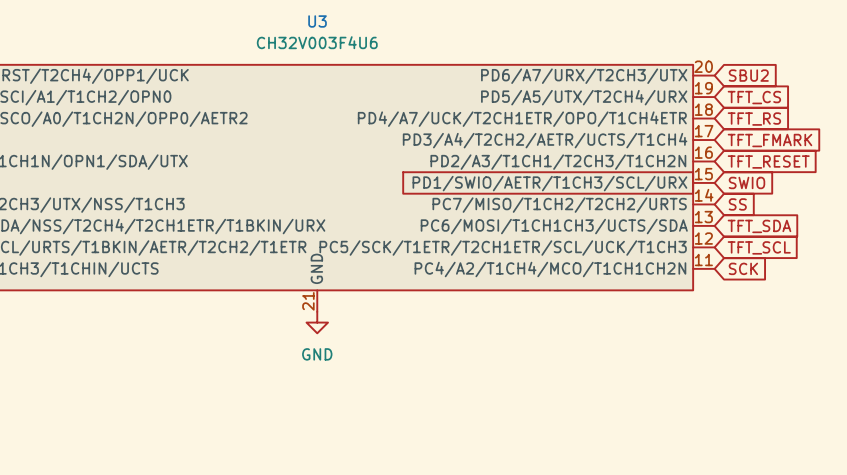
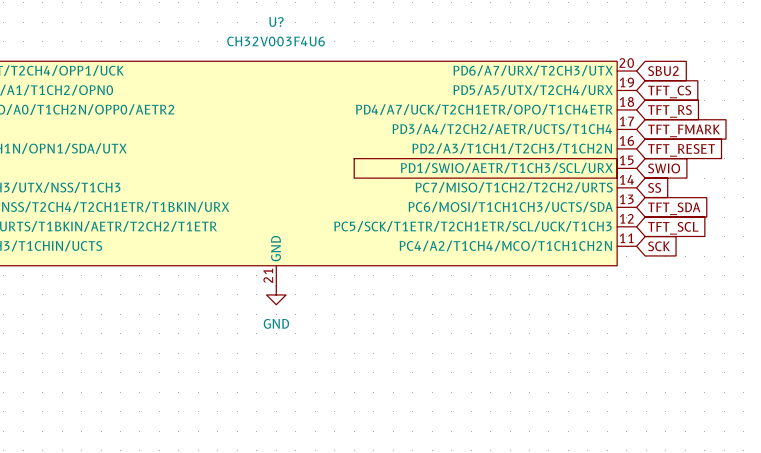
U3 name: U3 (317, 21) -> U? (276, 21)

